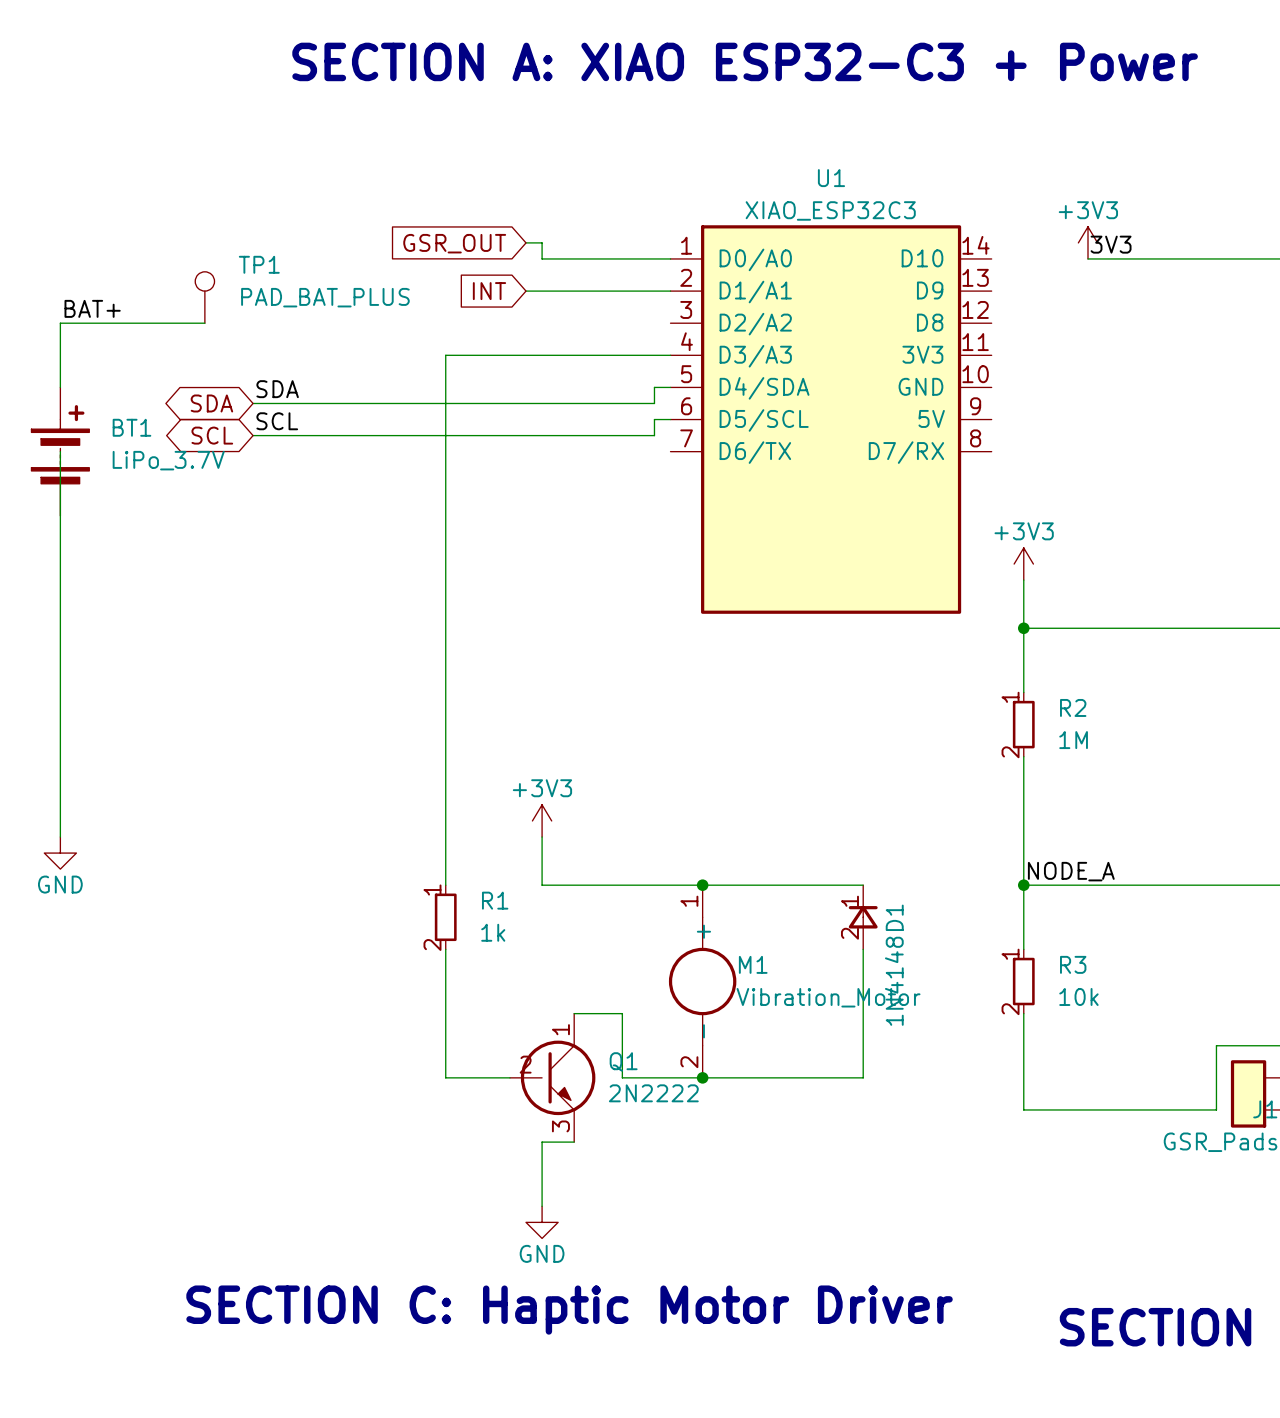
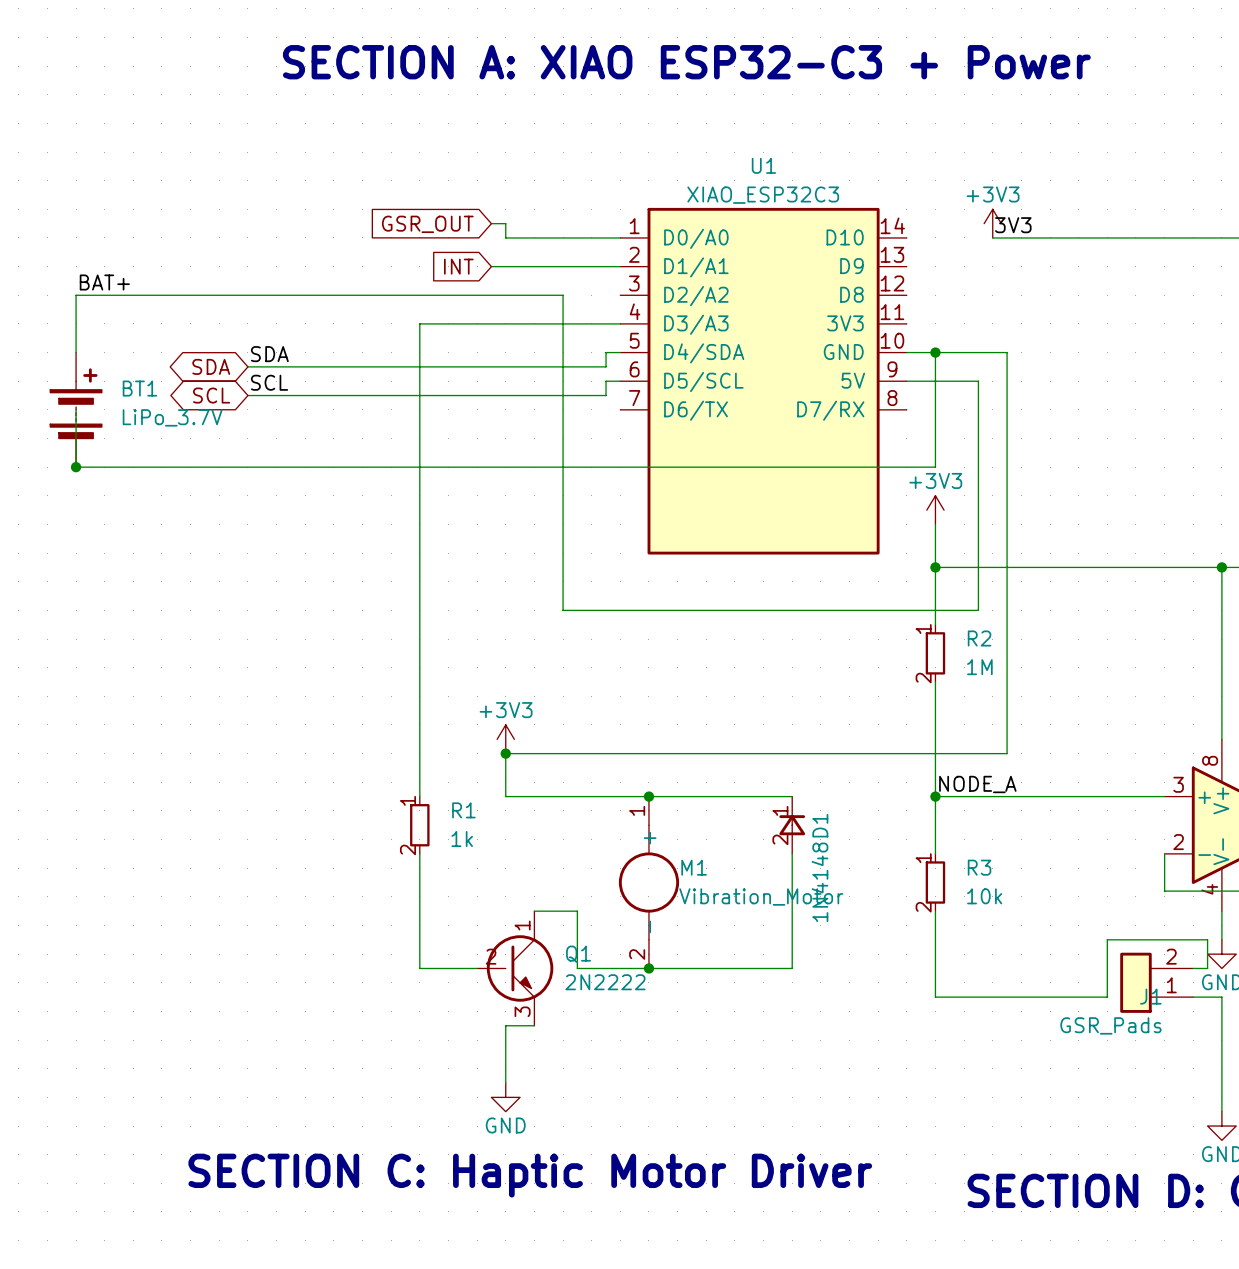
TP1: PAD_BAT_PLUS (204, 297) -> none
wire: none -> (204, 295) (563, 295) (563, 610) (978, 610) (978, 381) (906, 381)
wire: none -> (906, 352) (1007, 352) (1007, 753) (505, 753)
junction: none -> (935, 352)
wire: (60, 515) (60, 837) -> (76, 467) (935, 467) (935, 352)
junction: none -> (76, 467)
junction: none -> (505, 753)
power symbol: GND (60, 853) -> none

